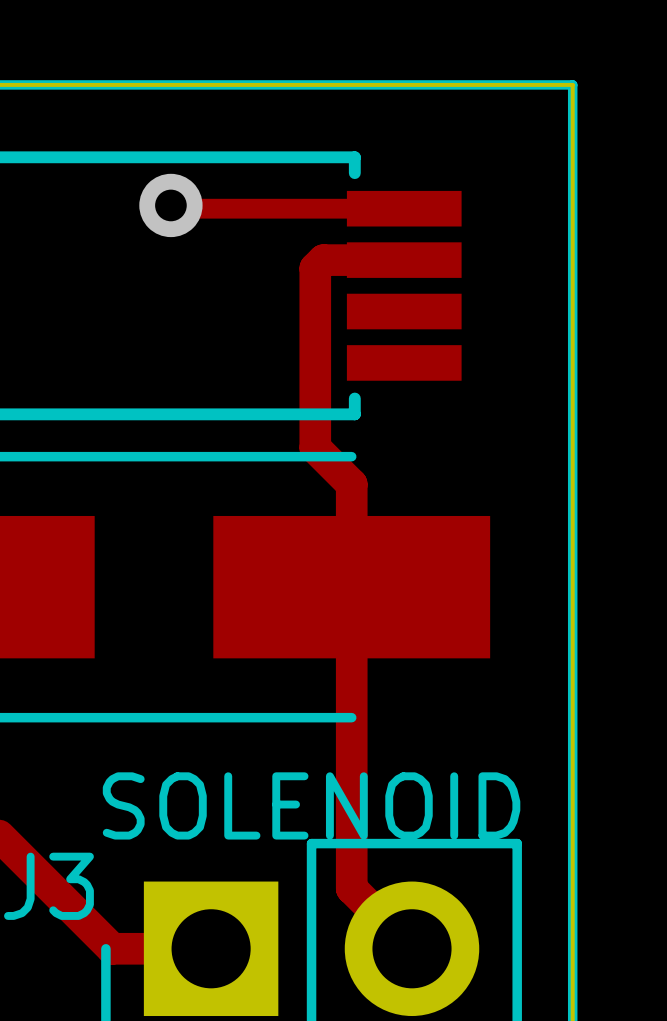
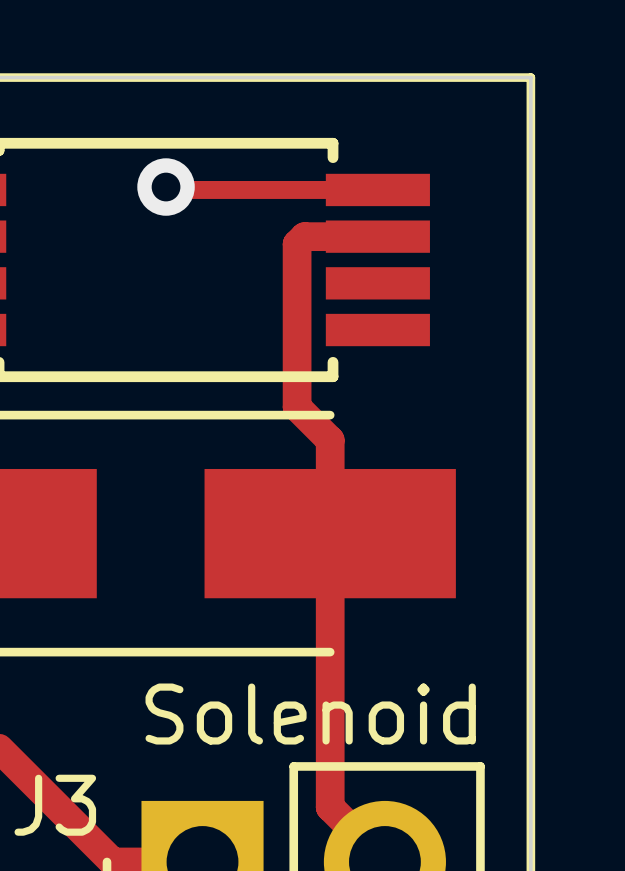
J3 value: SOLENOID (311, 805) -> Solenoid (310, 714)

